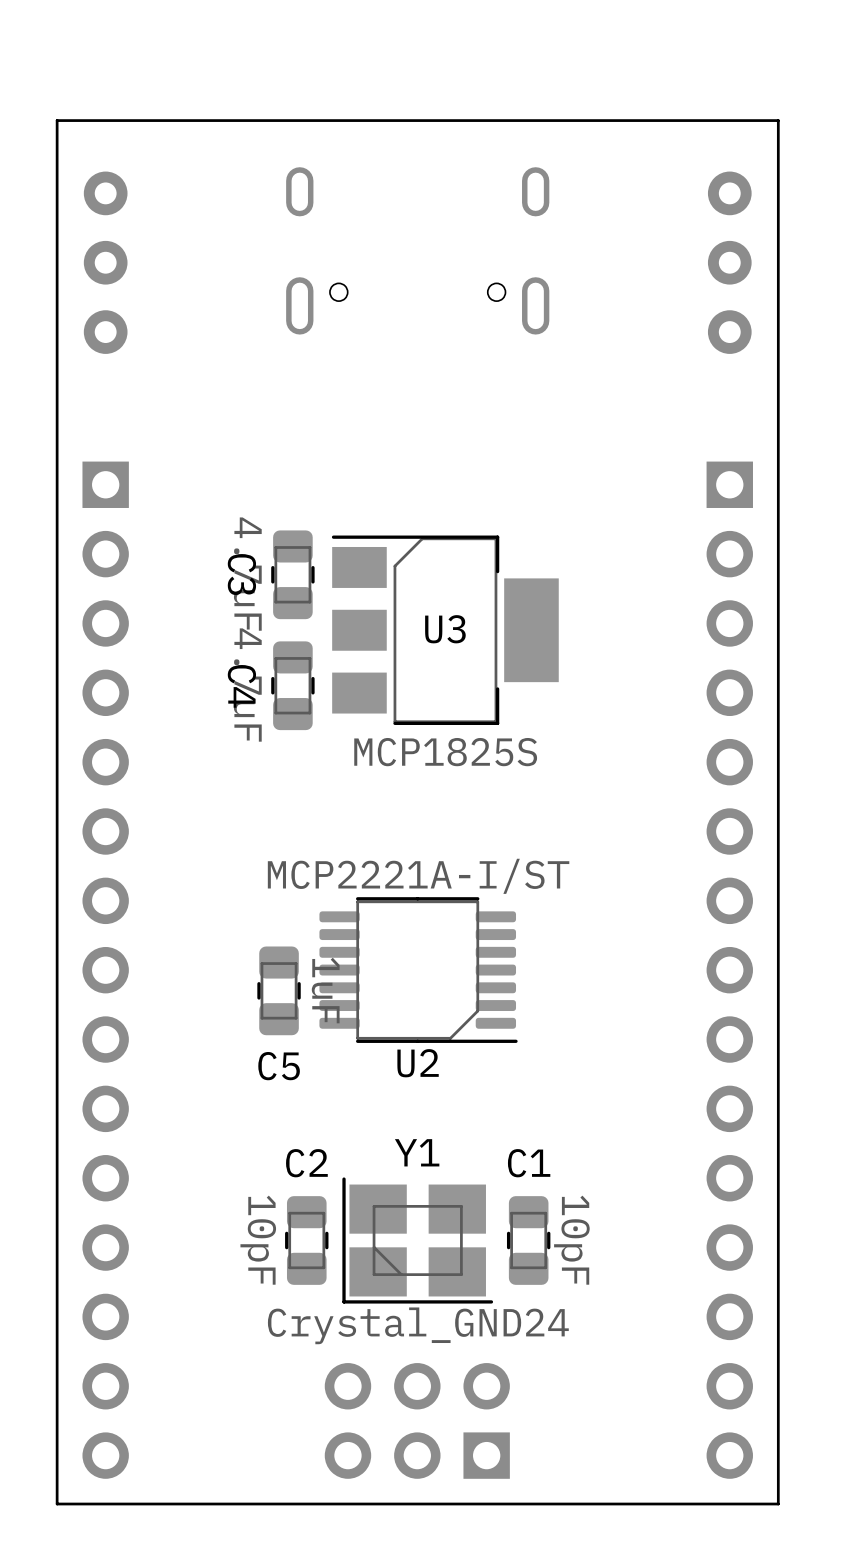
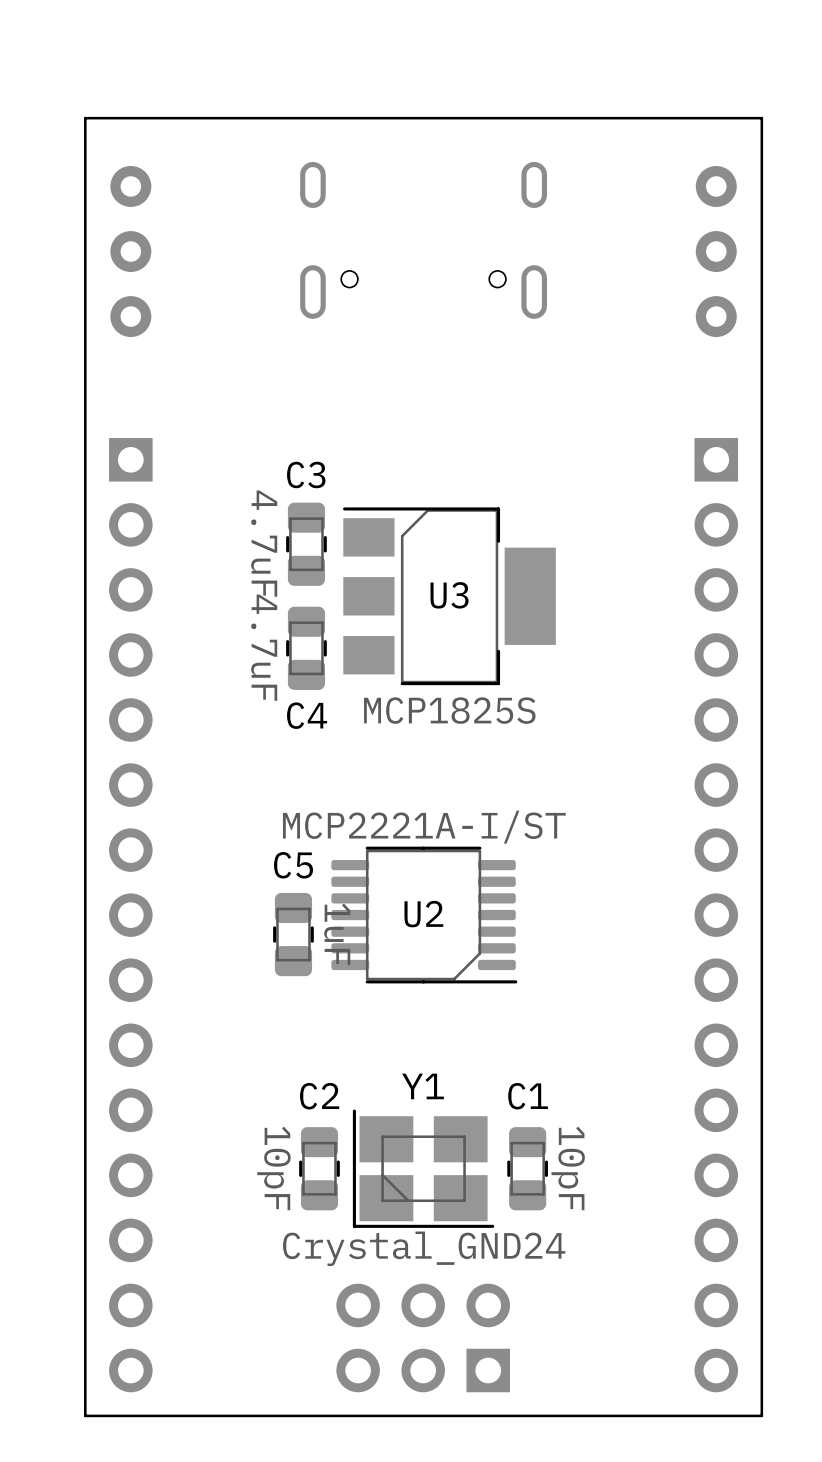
C3 name rotation: 0° (241, 574) -> 90° counterclockwise (306, 474)
C3 name position: C3 (241, 574) -> C3 (306, 474)
C4 name rotation: 0° (241, 686) -> 90° counterclockwise (307, 715)
C4 name position: C4 (241, 686) -> C4 (307, 715)
U2 name position: U2 (418, 1063) -> U2 (423, 914)
C5 name position: C5 (279, 1066) -> C5 (293, 865)

